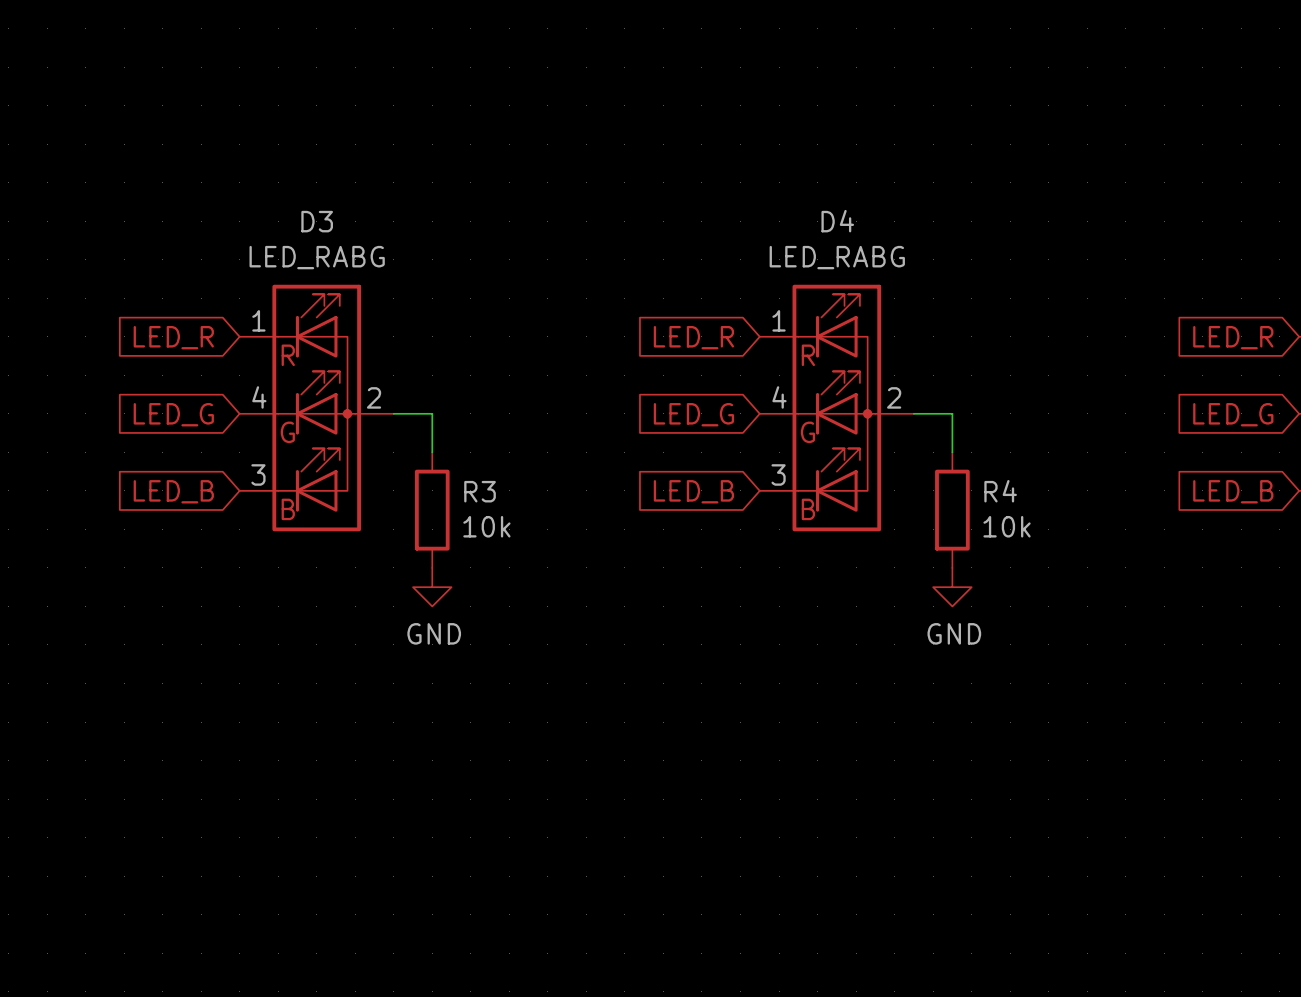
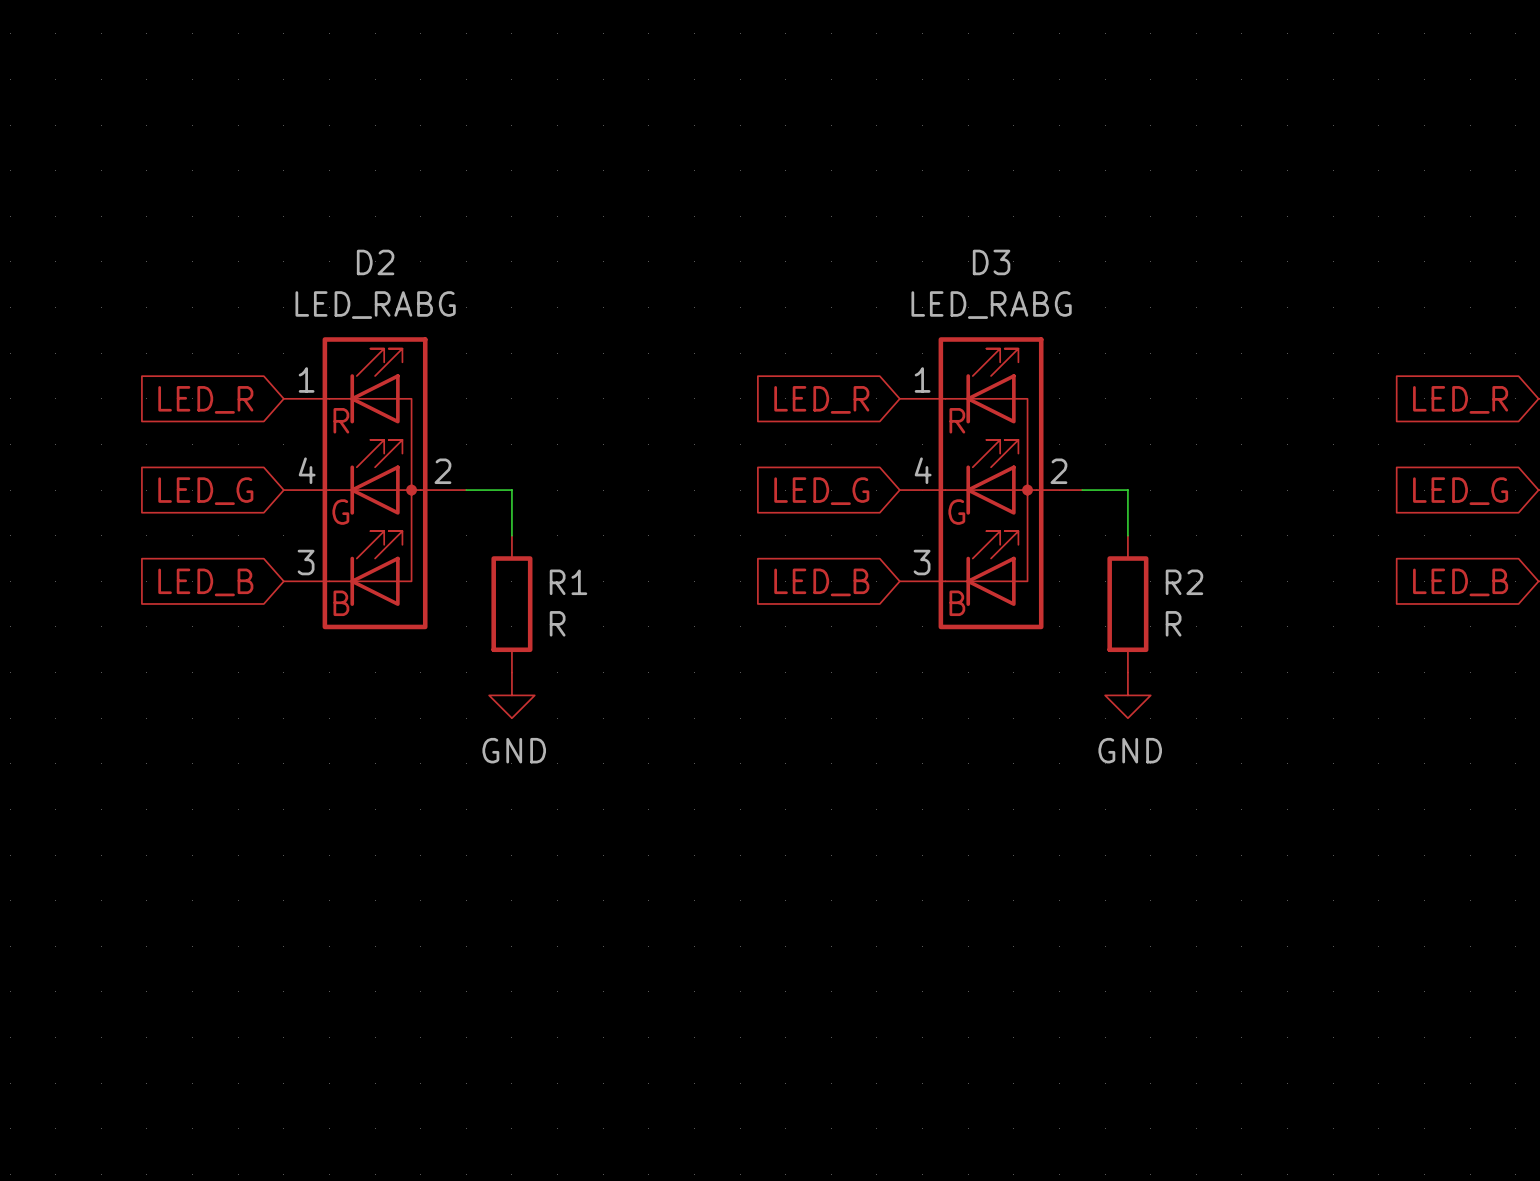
D3 name: D3 (317, 221) -> D2 (375, 262)
D4 name: D4 (837, 221) -> D3 (991, 262)
R3 name: R3 (480, 491) -> R1 (568, 582)
R4 name: R4 (1000, 491) -> R2 (1184, 582)
R3 value: 10k (486, 526) -> R (557, 623)
R4 value: 10k (1007, 526) -> R (1173, 623)

